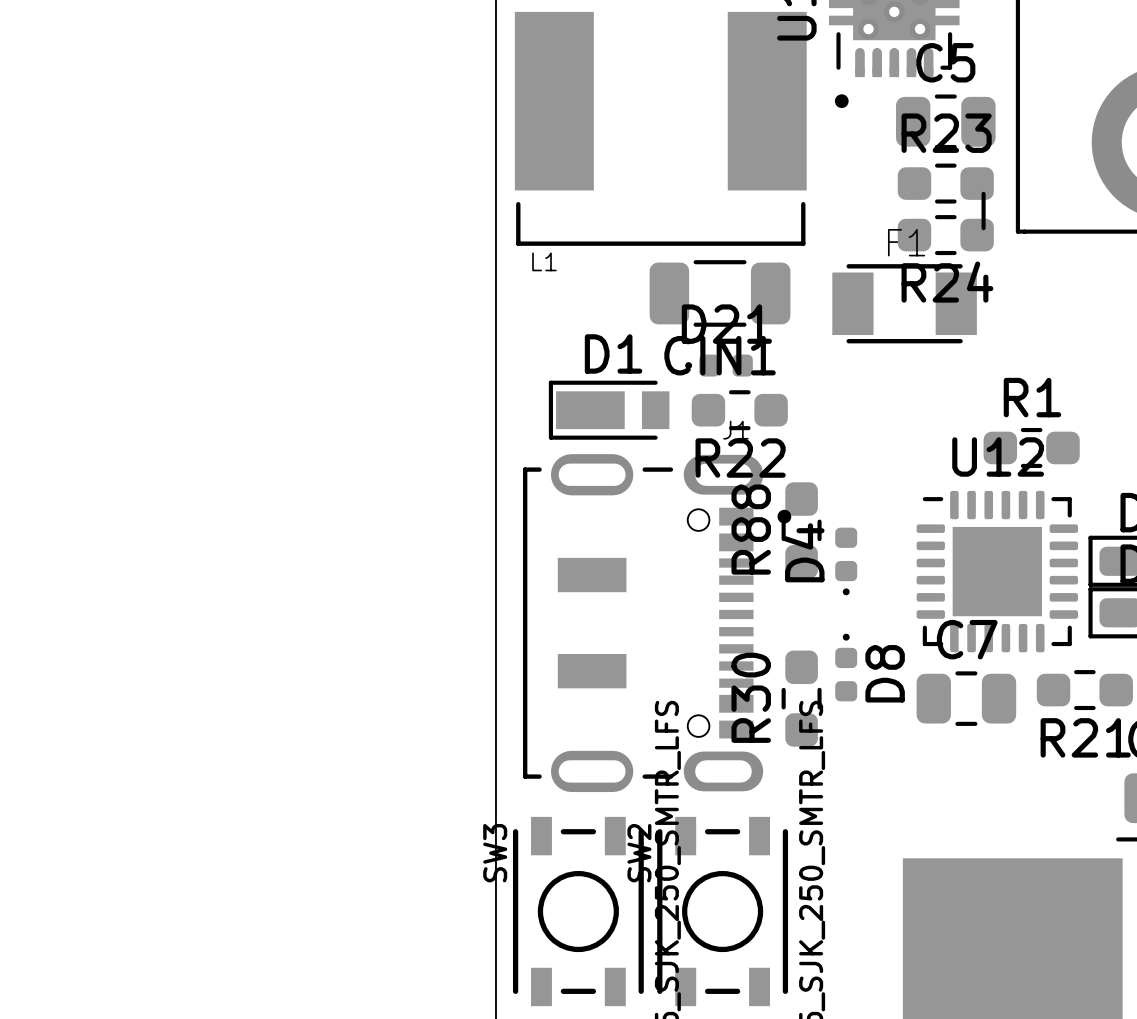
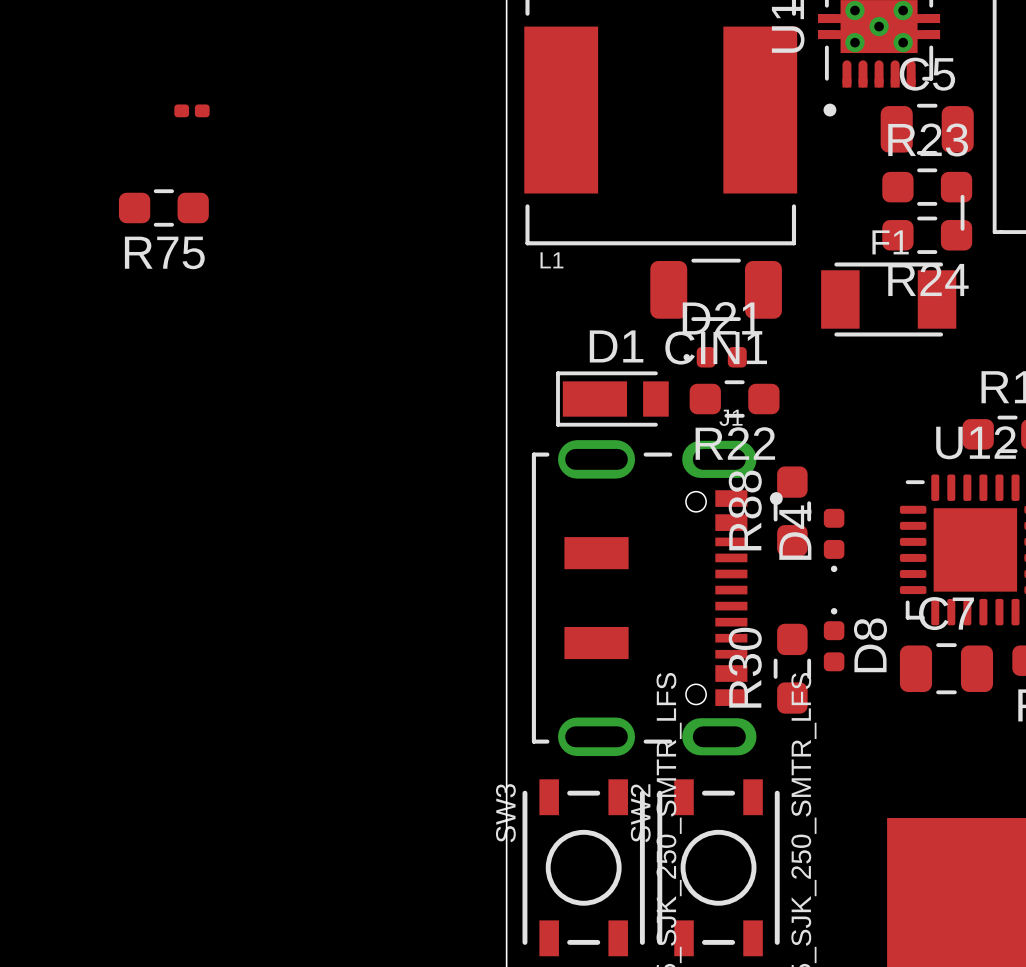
part: none -> (191, 110)
R75: none -> (163, 207)

